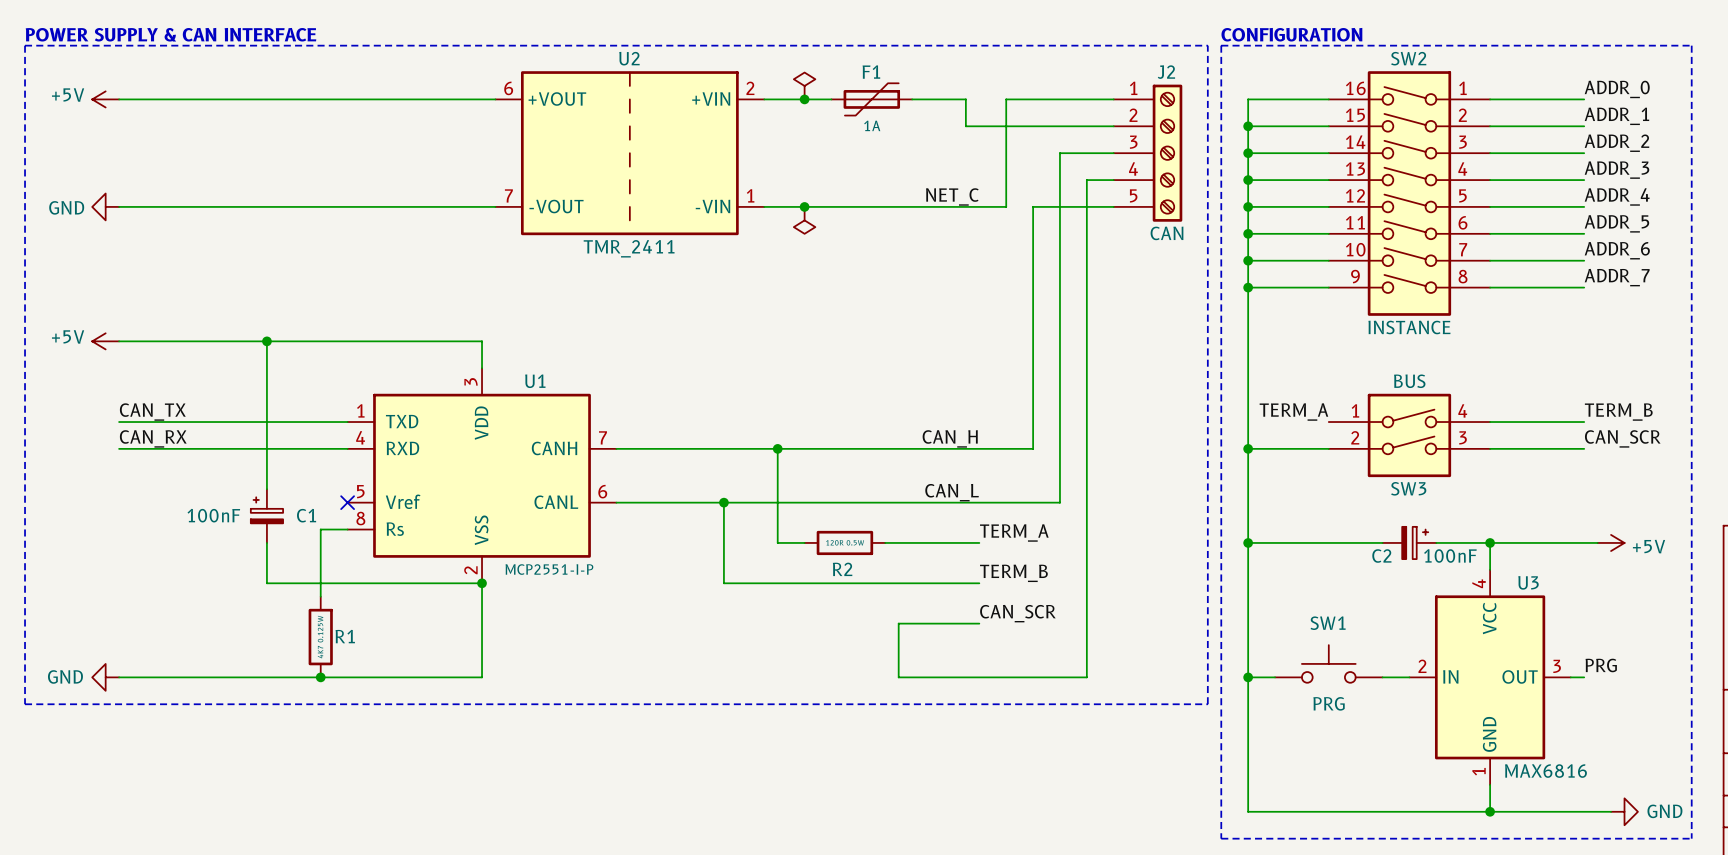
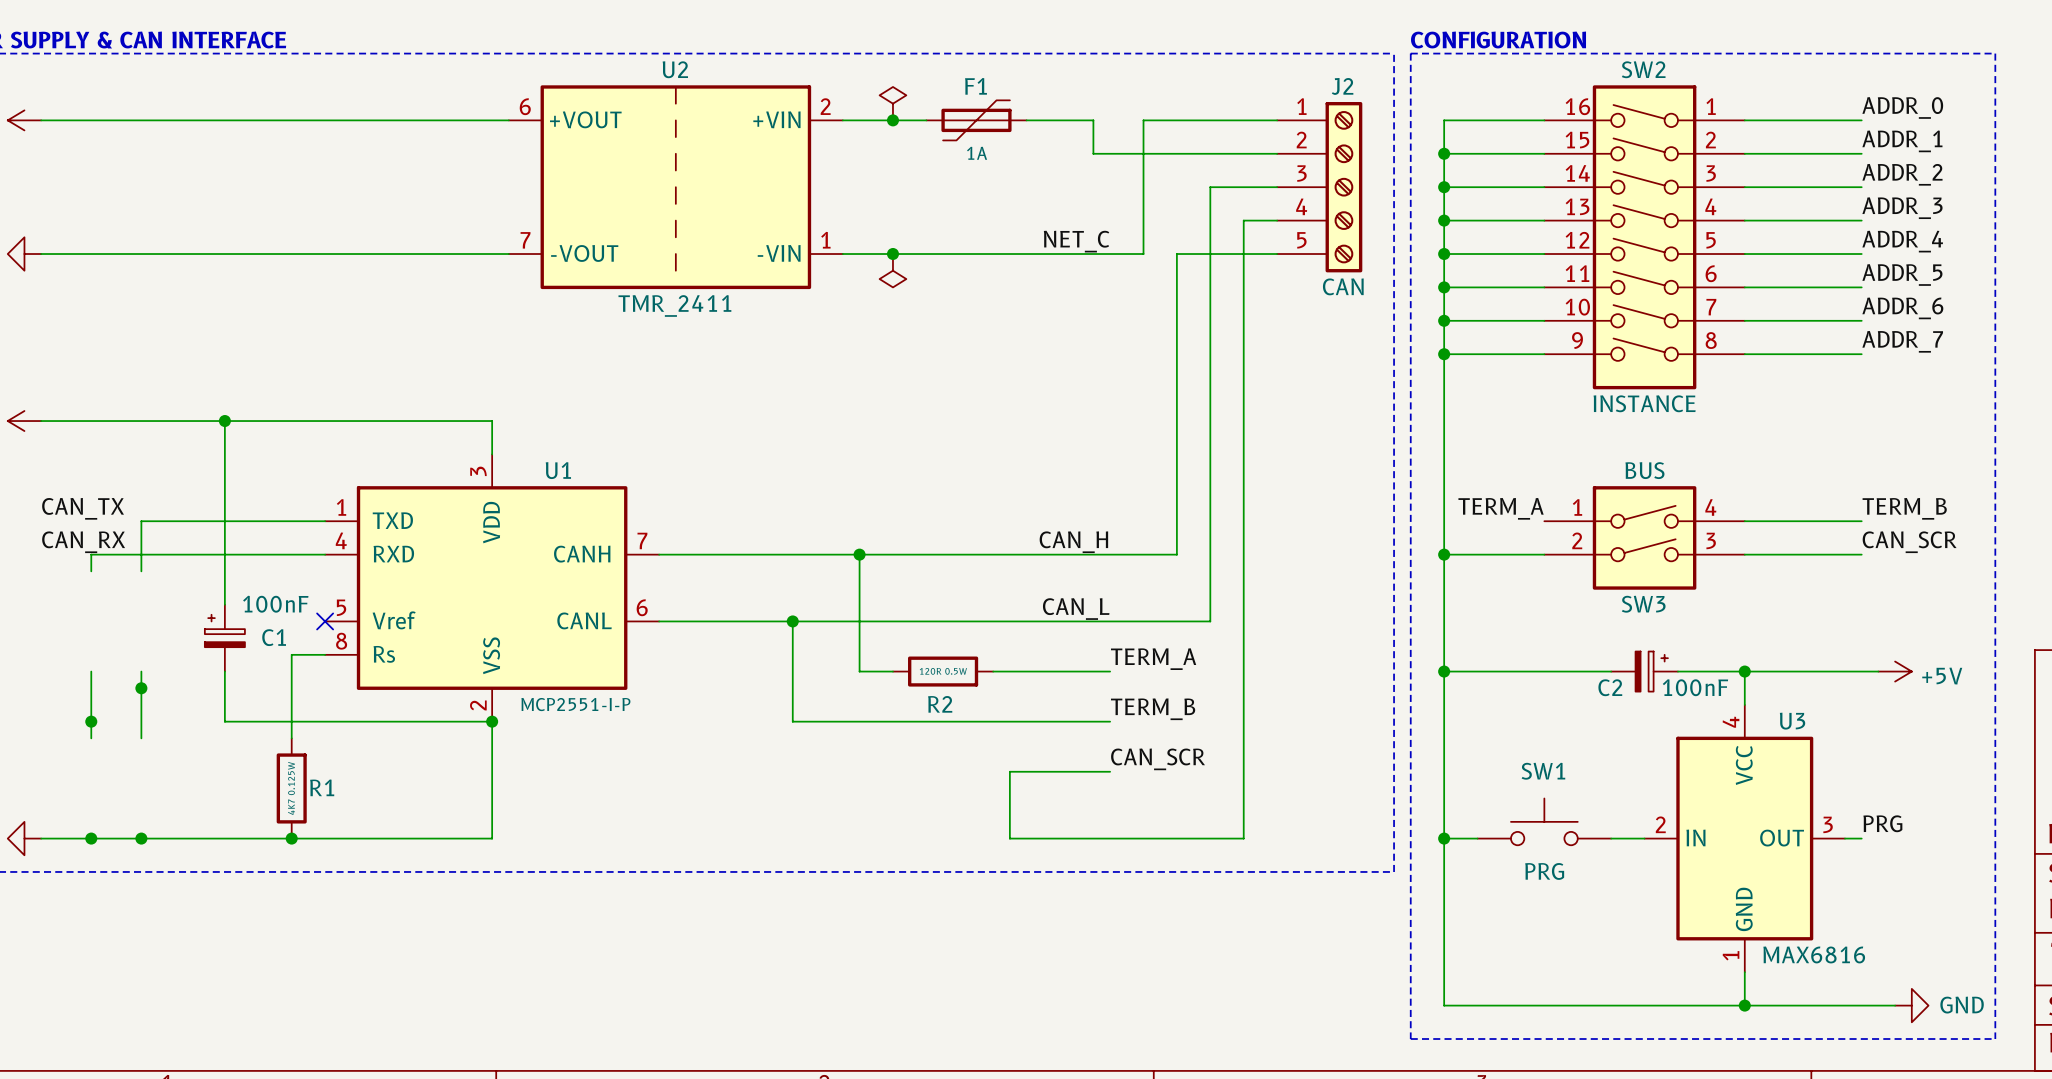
wire: (119, 422) (199, 422) -> (141, 571) (141, 521)
wire: (119, 448) (159, 448) -> (91, 571) (91, 554)
C1 value position: 100nF (213, 515) -> 100nF (275, 604)
wire: none -> (91, 671) (91, 738)
wire: none -> (141, 671) (141, 738)
junction: none -> (141, 688)
junction: none -> (91, 721)
junction: none -> (91, 838)
junction: none -> (141, 838)

